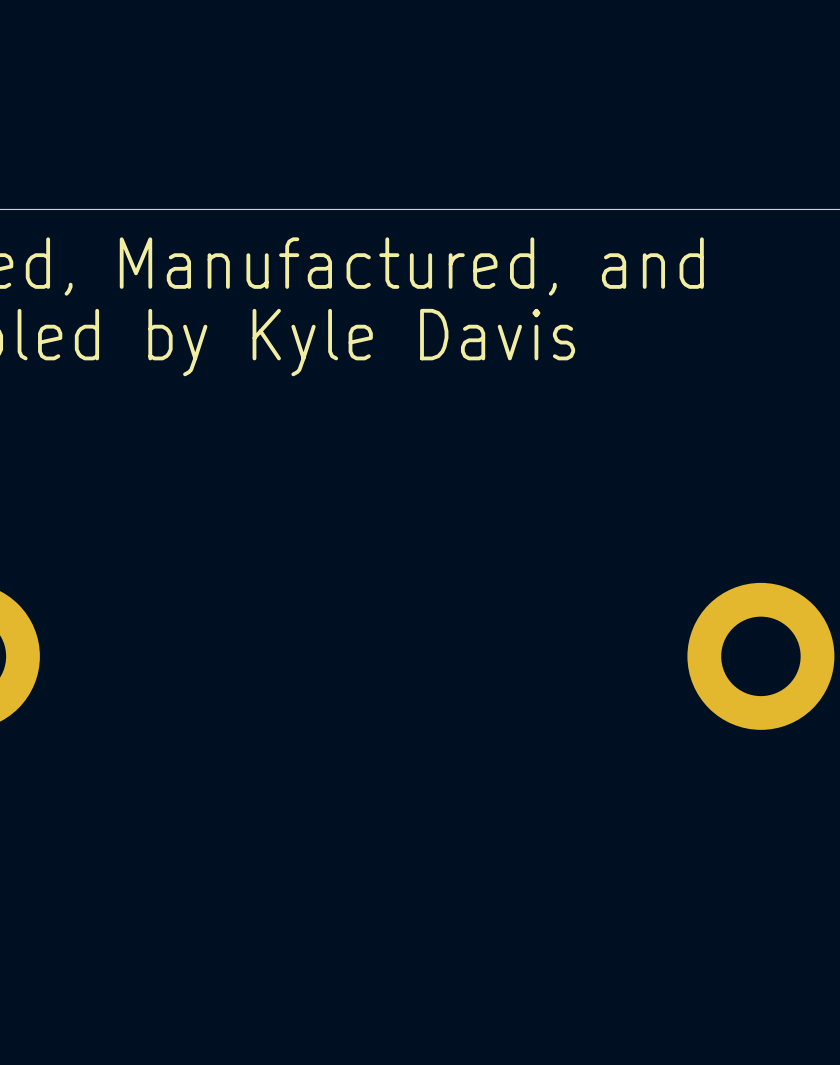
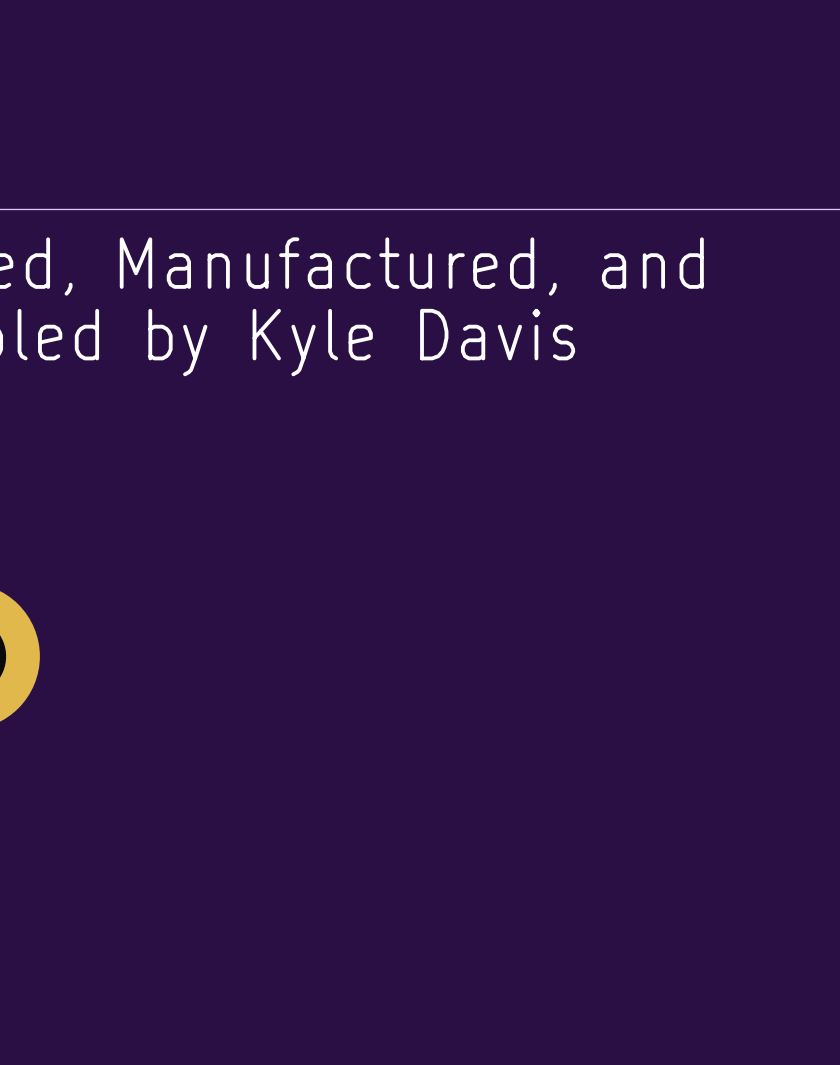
part: (760, 656) -> none

